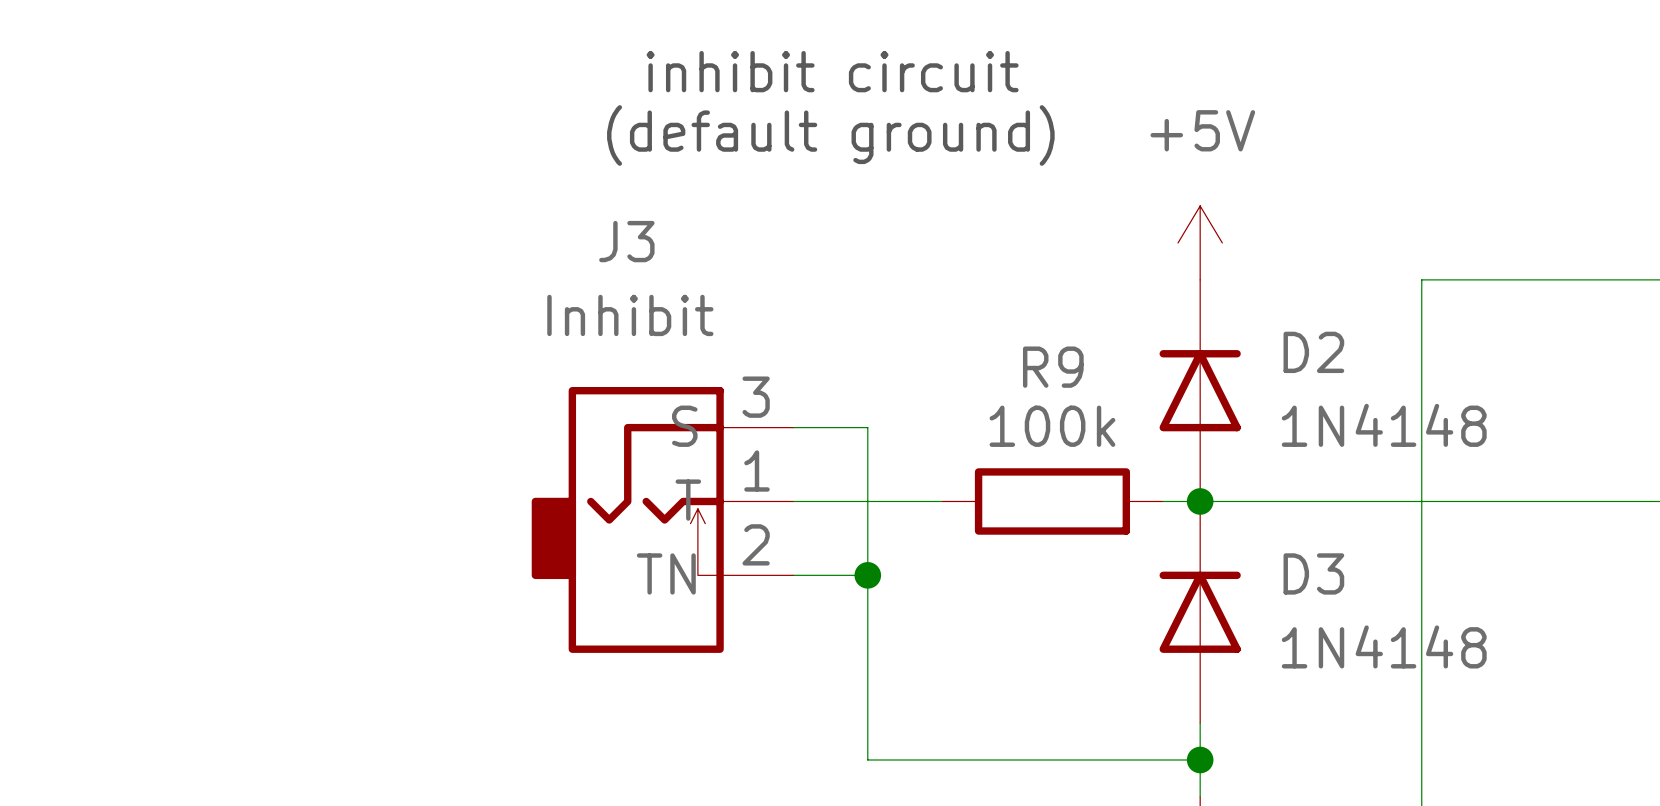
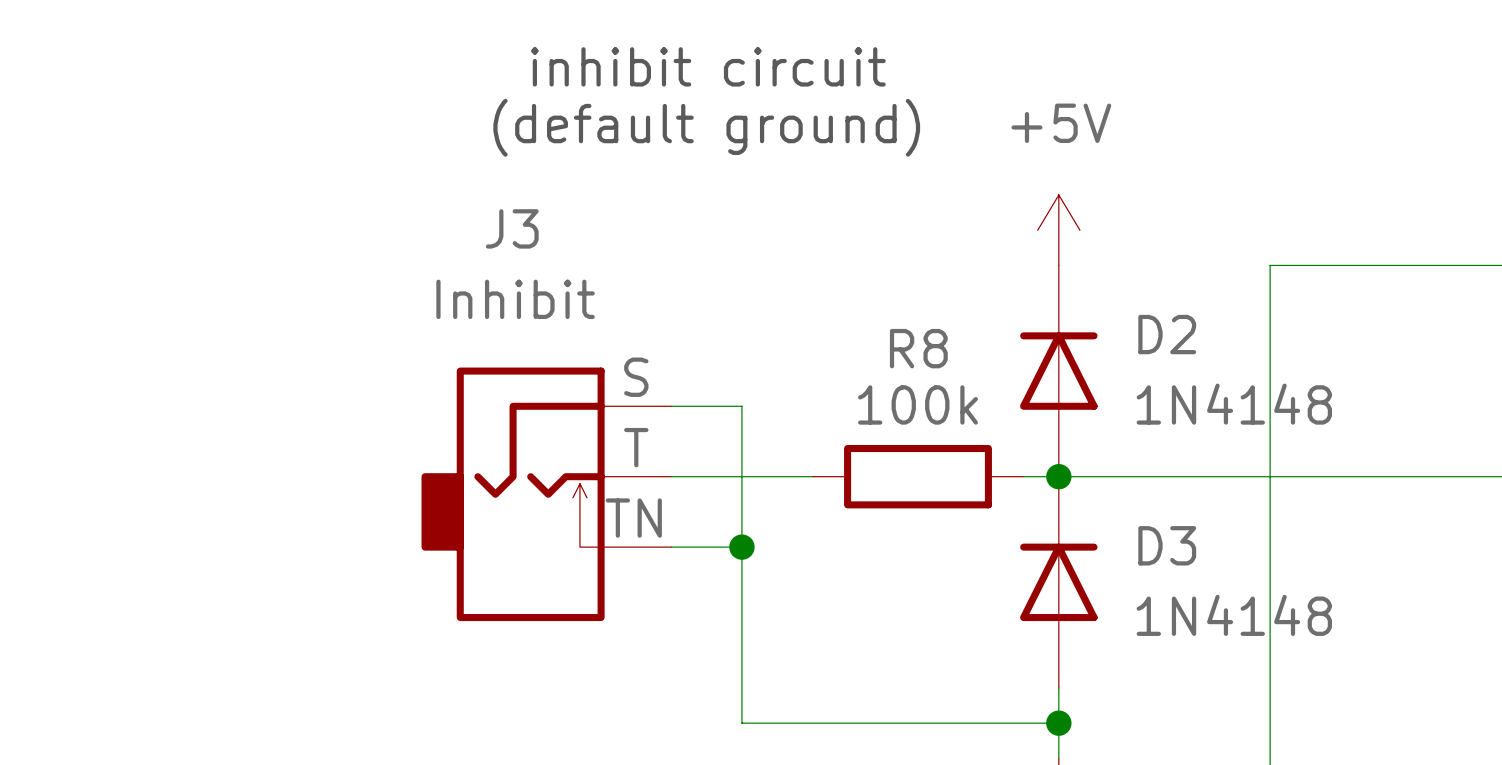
R9 name: R9 (1053, 367) -> R8 (918, 348)
J3 pin number: 3 (756, 397) -> S (636, 377)
J3 pin name: S (684, 426) -> none
J3 pin number: 1 (756, 471) -> T (636, 447)
J3 pin name: T (688, 500) -> none
J3 pin number: 2 (756, 544) -> TN (633, 518)
J3 pin name: TN (666, 573) -> none

